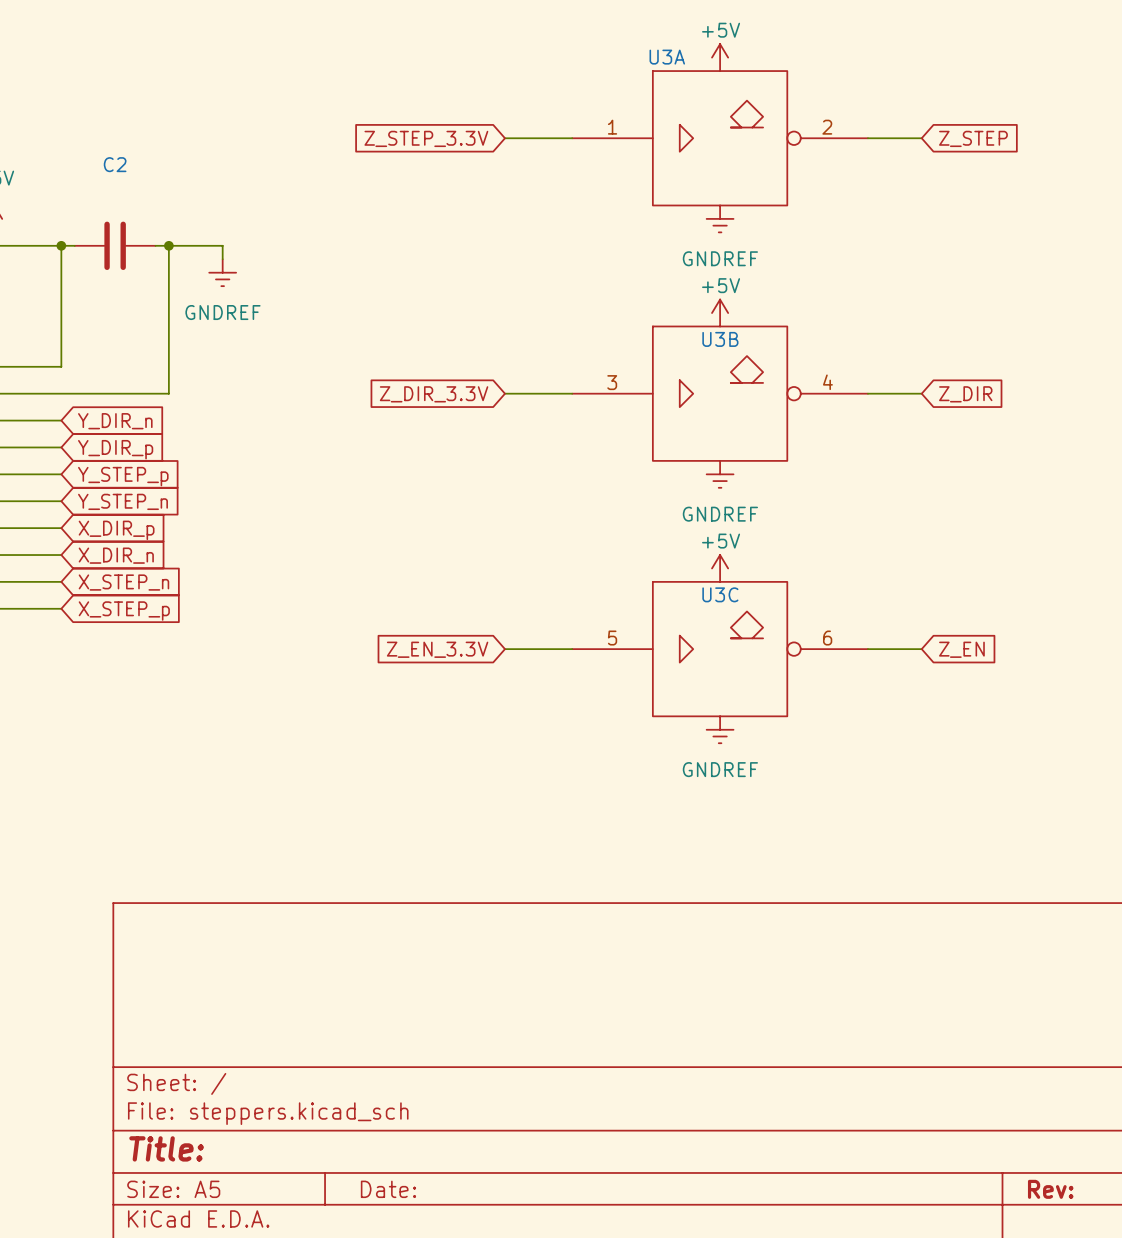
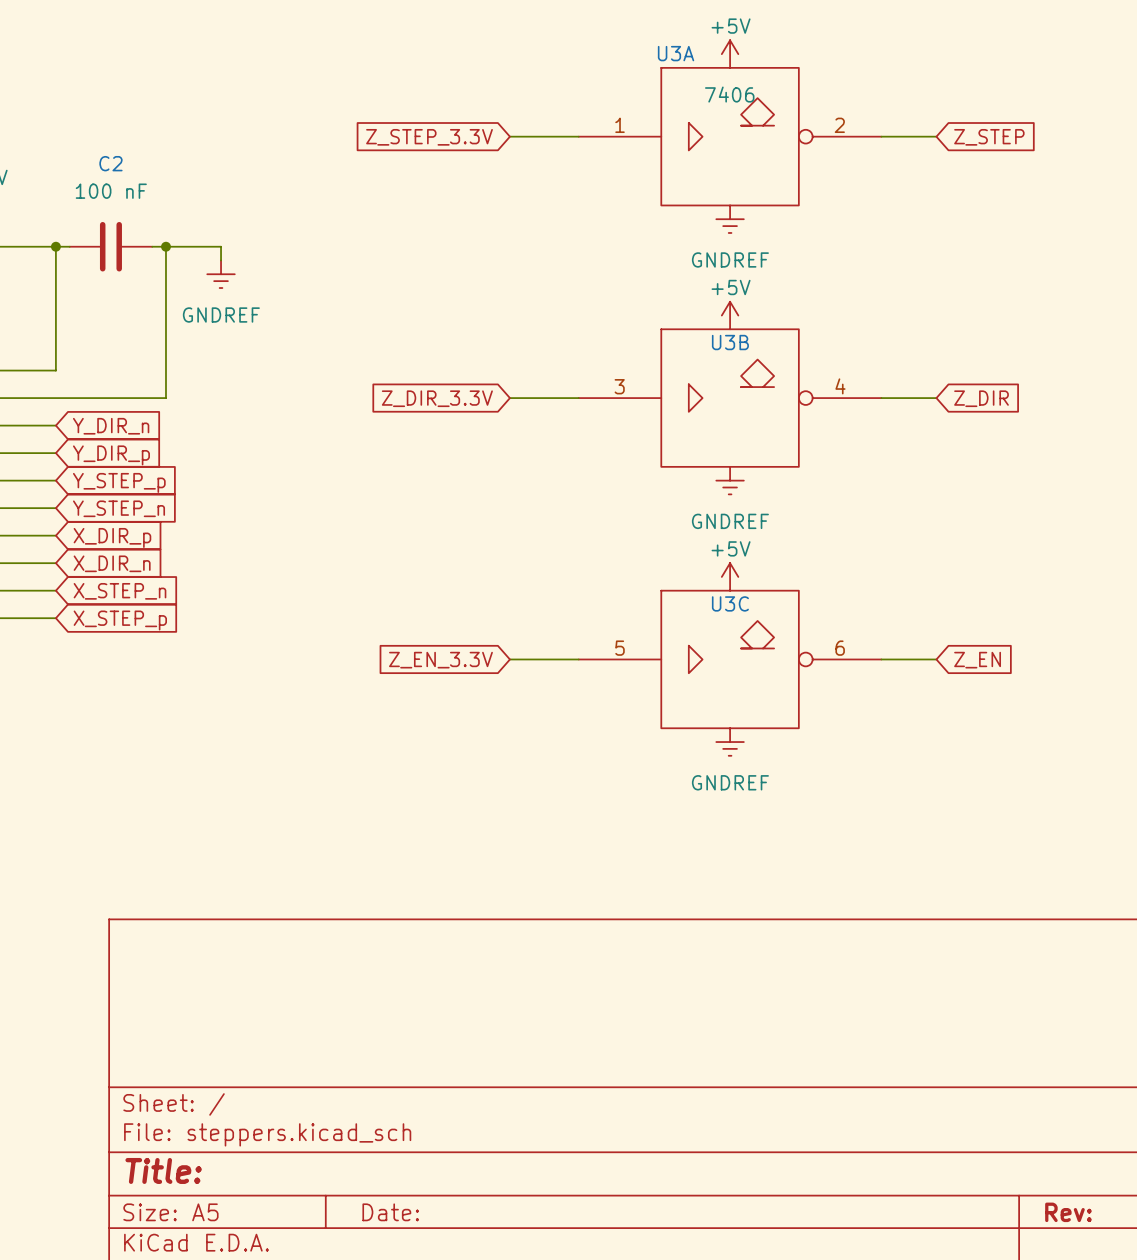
U3A value: none -> 7406 (729, 94)
C2 value: none -> 100 nF (111, 191)

